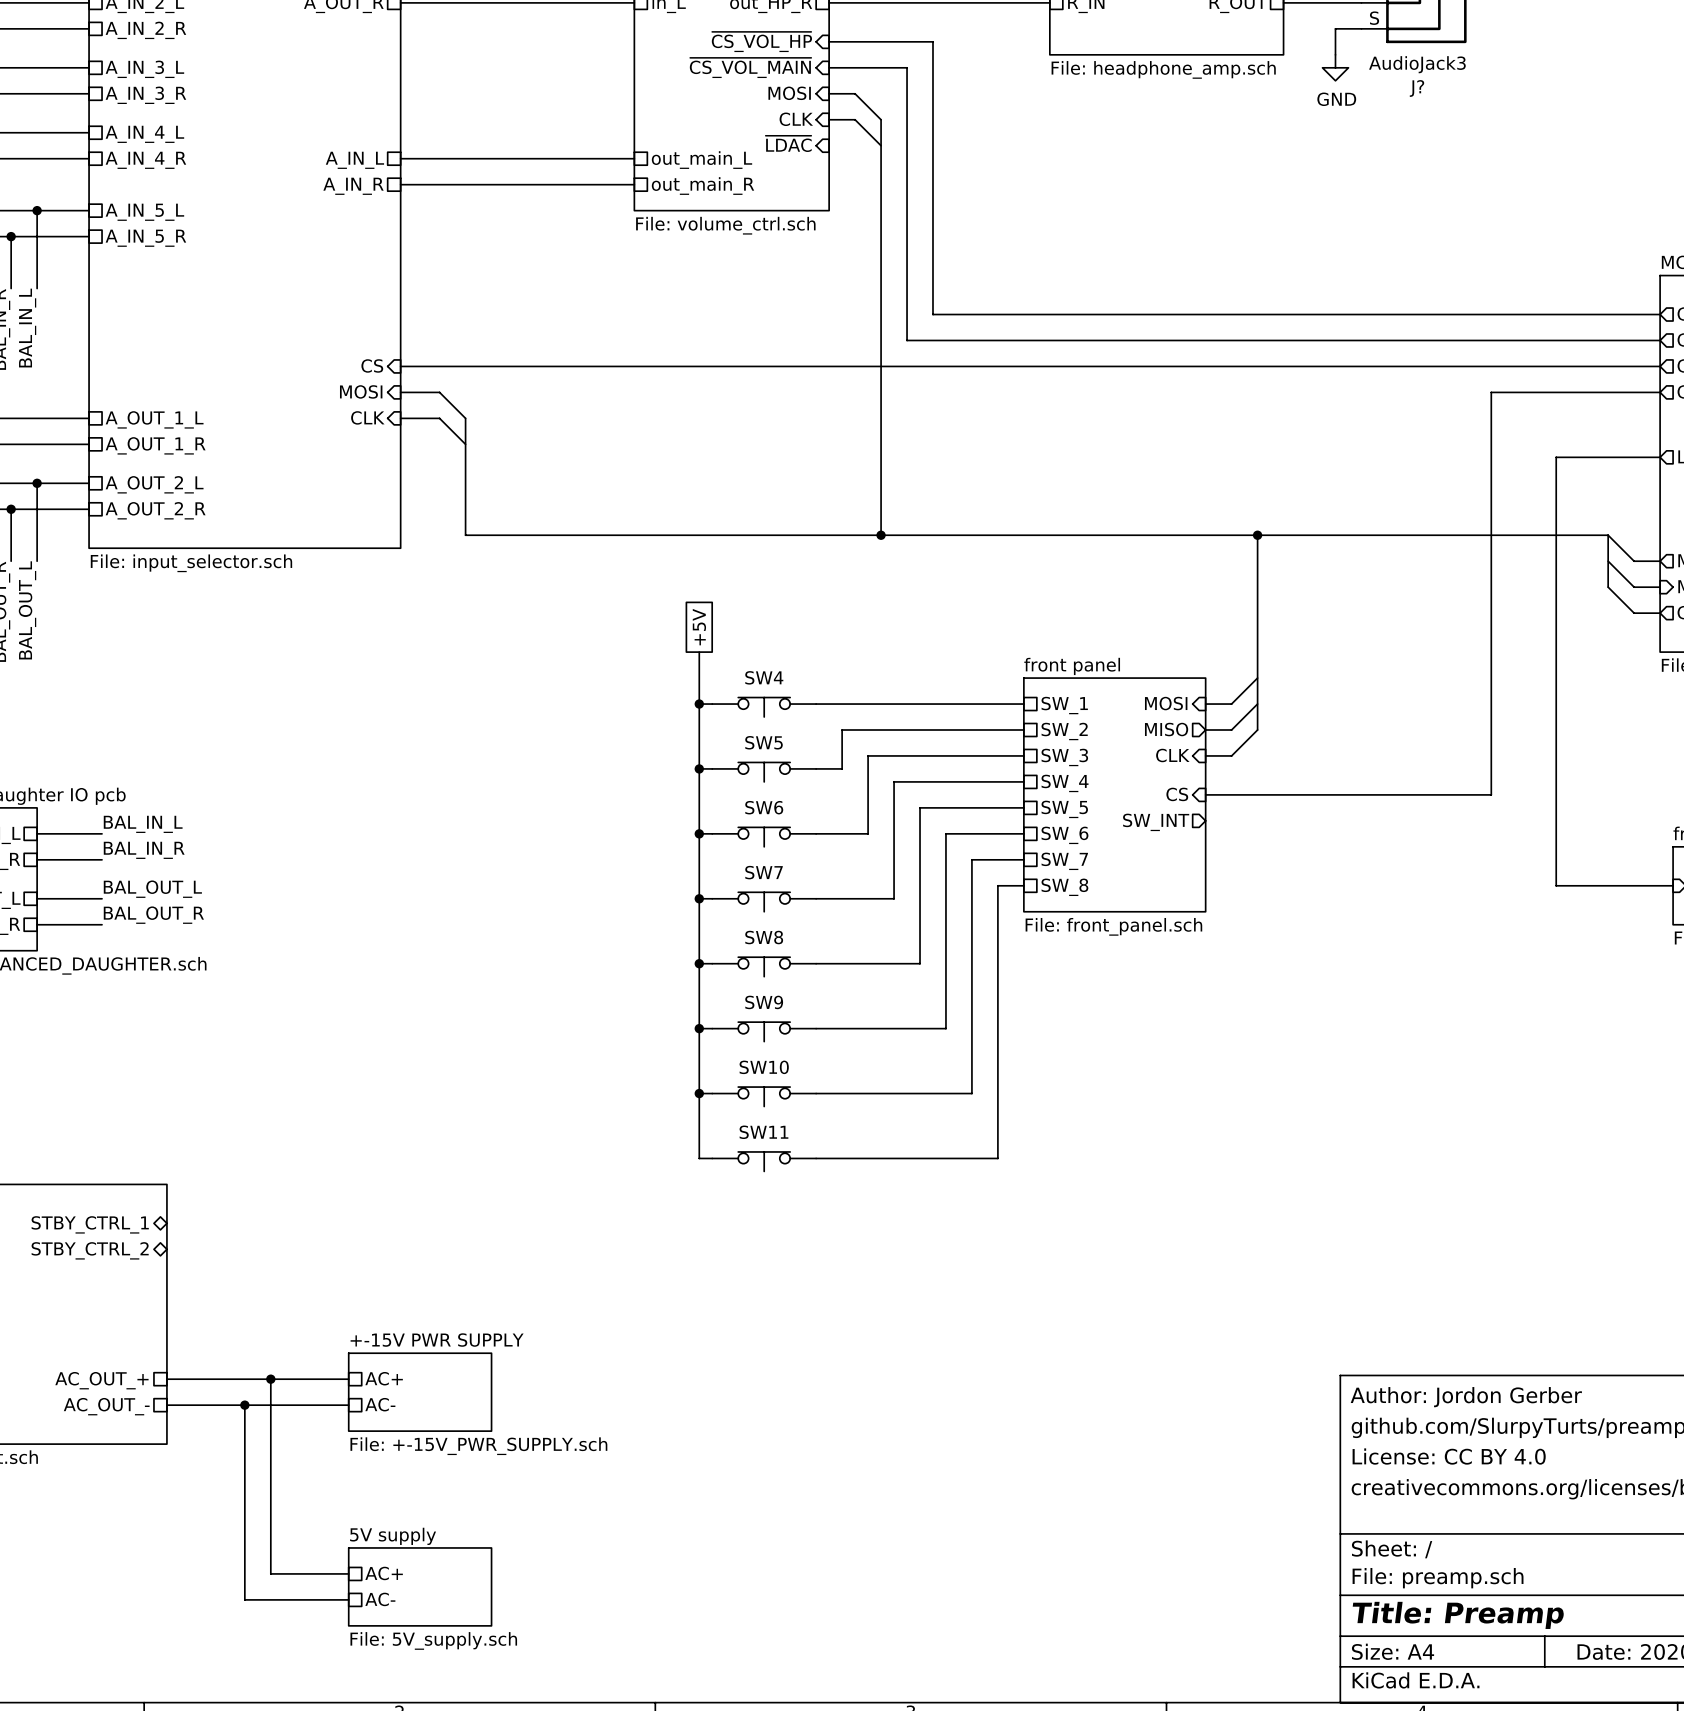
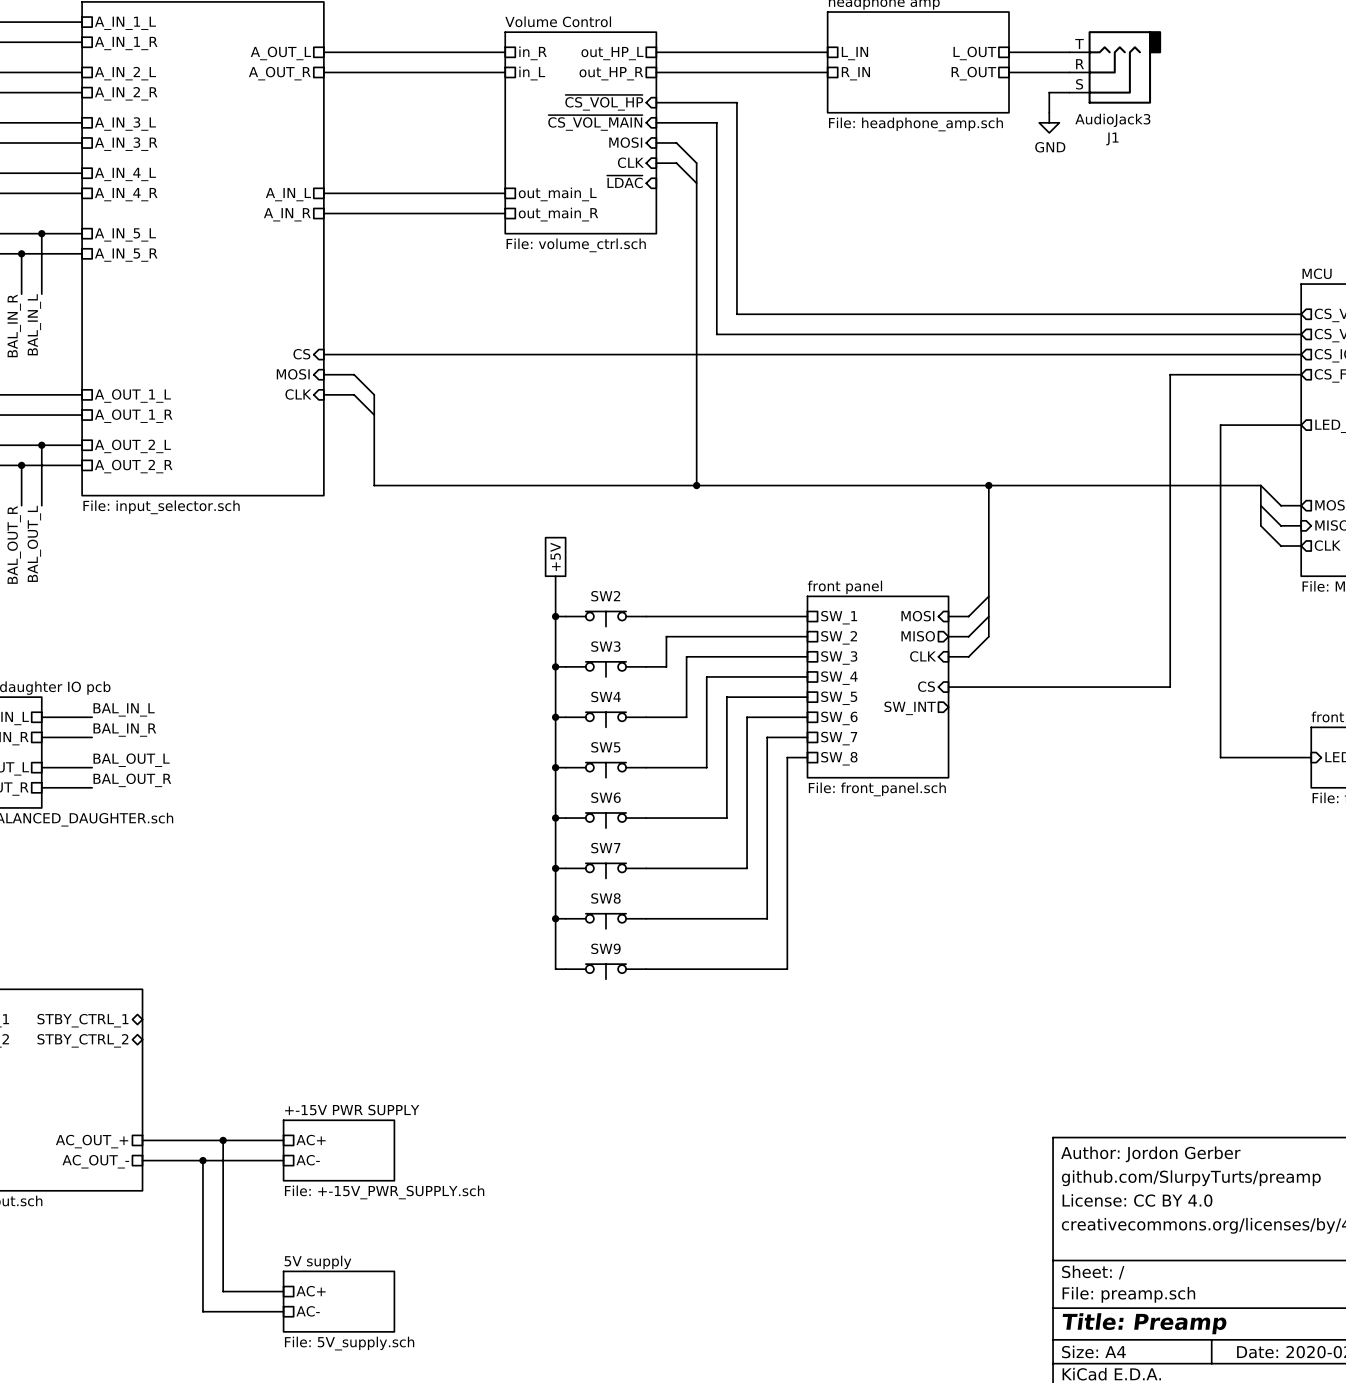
J? name: J? (1416, 88) -> J1 (1112, 138)
SW4 name: SW4 (764, 677) -> SW2 (605, 596)
SW5 name: SW5 (764, 742) -> SW3 (605, 646)
SW6 name: SW6 (764, 807) -> SW4 (606, 696)
SW7 name: SW7 (764, 872) -> SW5 (605, 747)
SW8 name: SW8 (764, 937) -> SW6 (606, 797)
SW9 name: SW9 (764, 1002) -> SW7 (605, 848)
SW10 name: SW10 (764, 1067) -> SW8 (605, 898)
SW11 name: SW11 (763, 1132) -> SW9 (605, 948)

